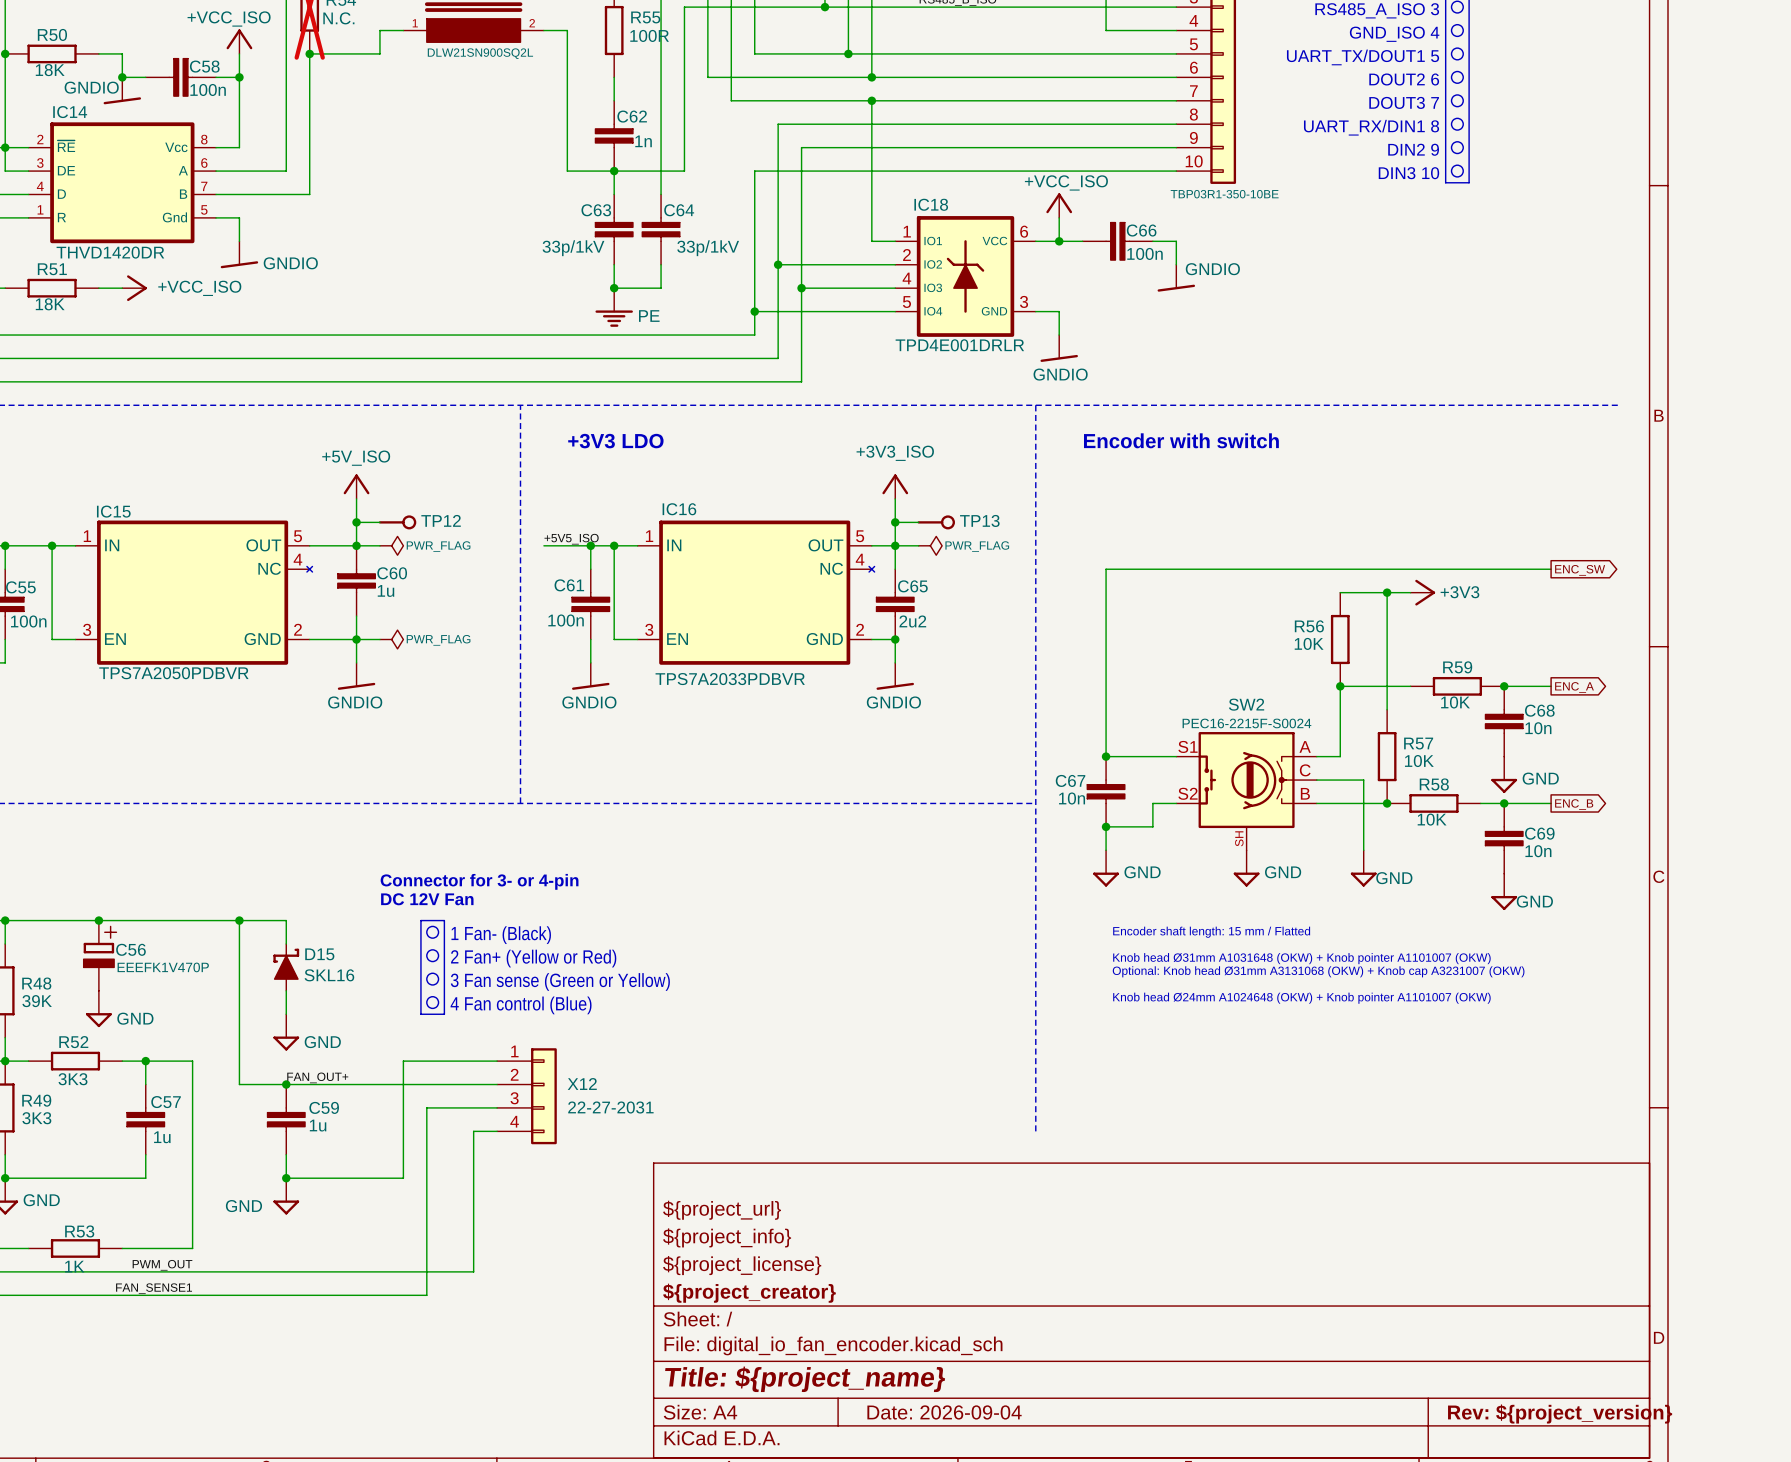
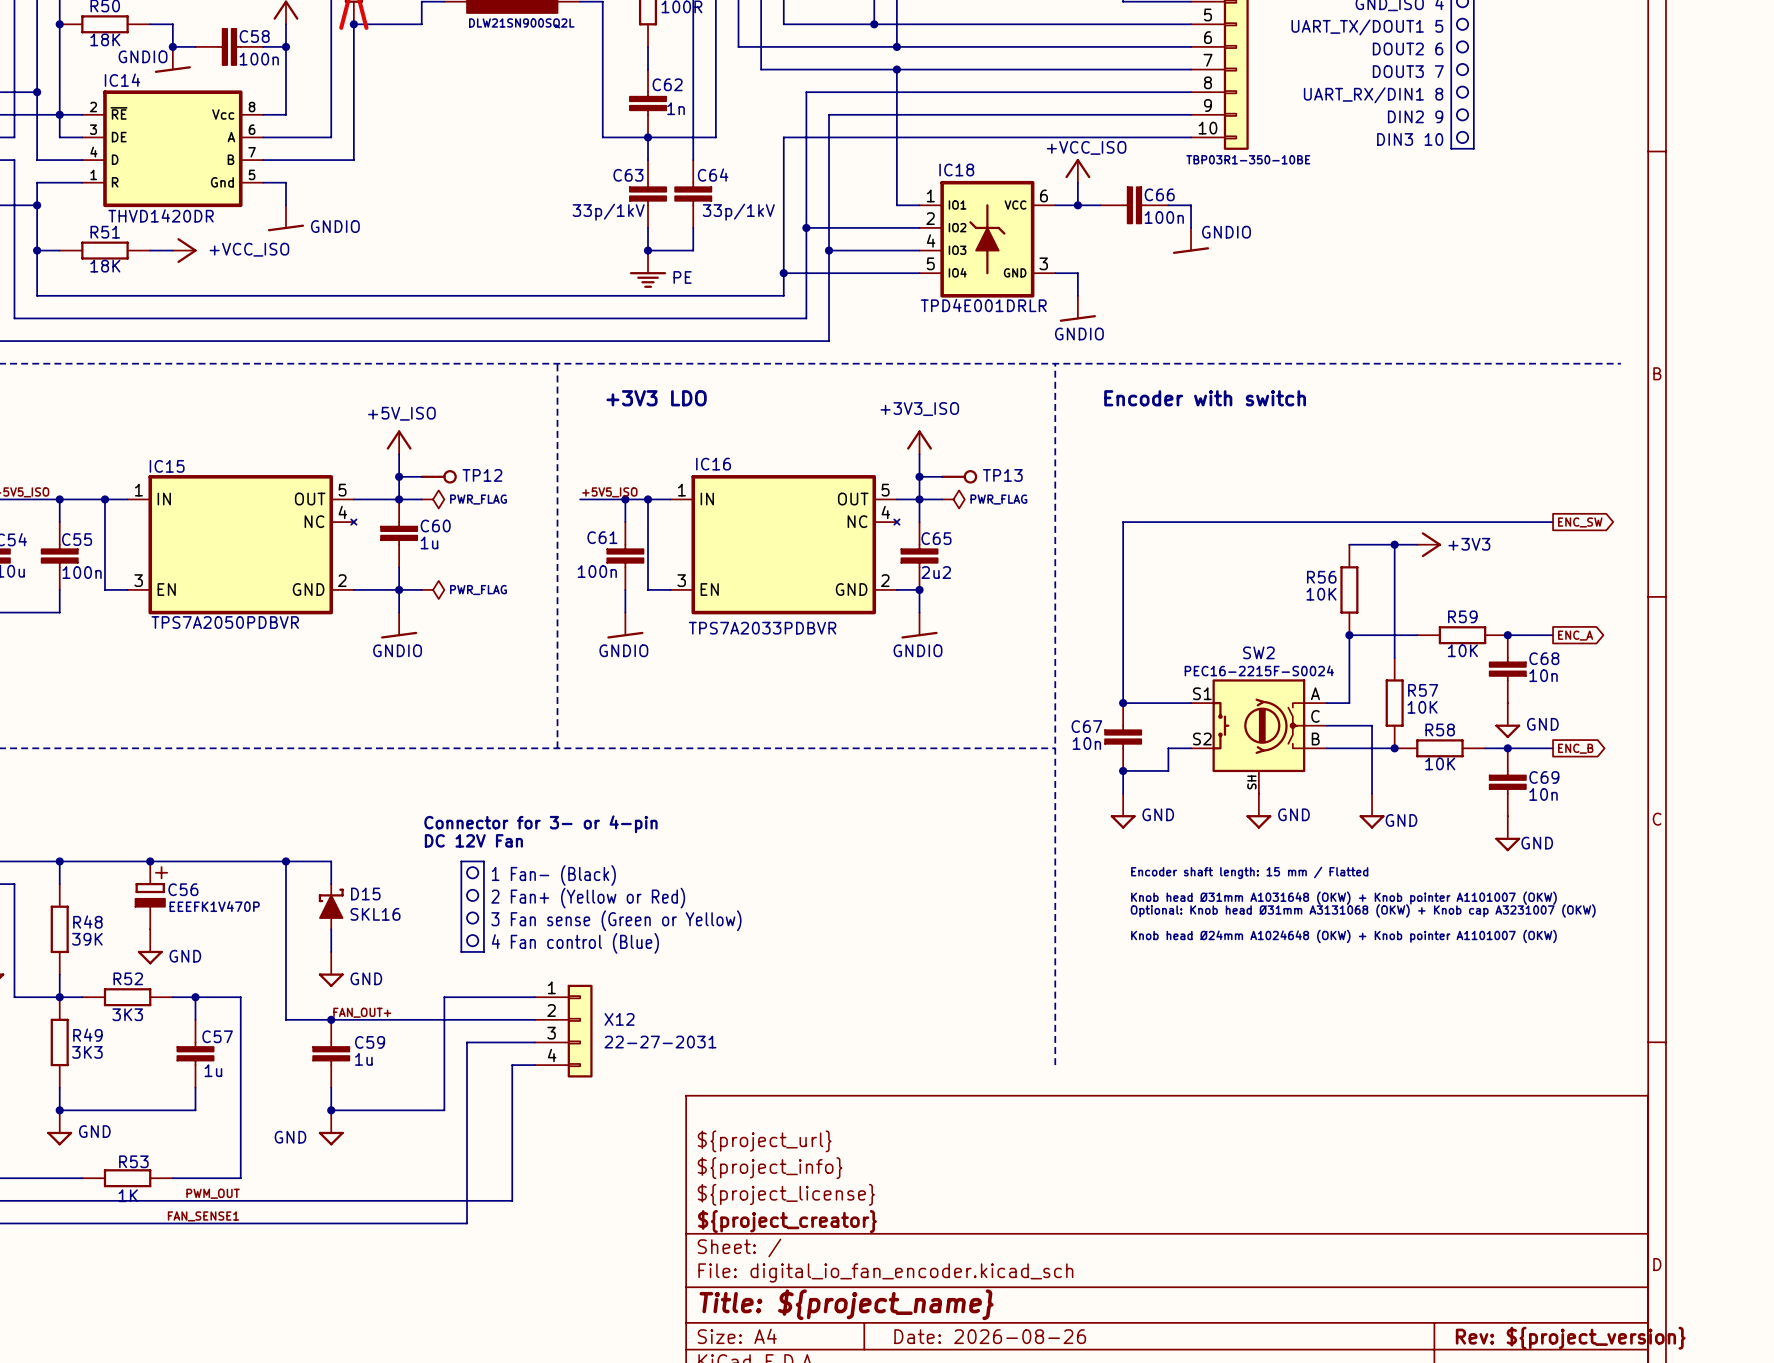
title block: Date: 2026-09-04 (944, 1412) -> Date: 2026-08-26 (990, 1336)

